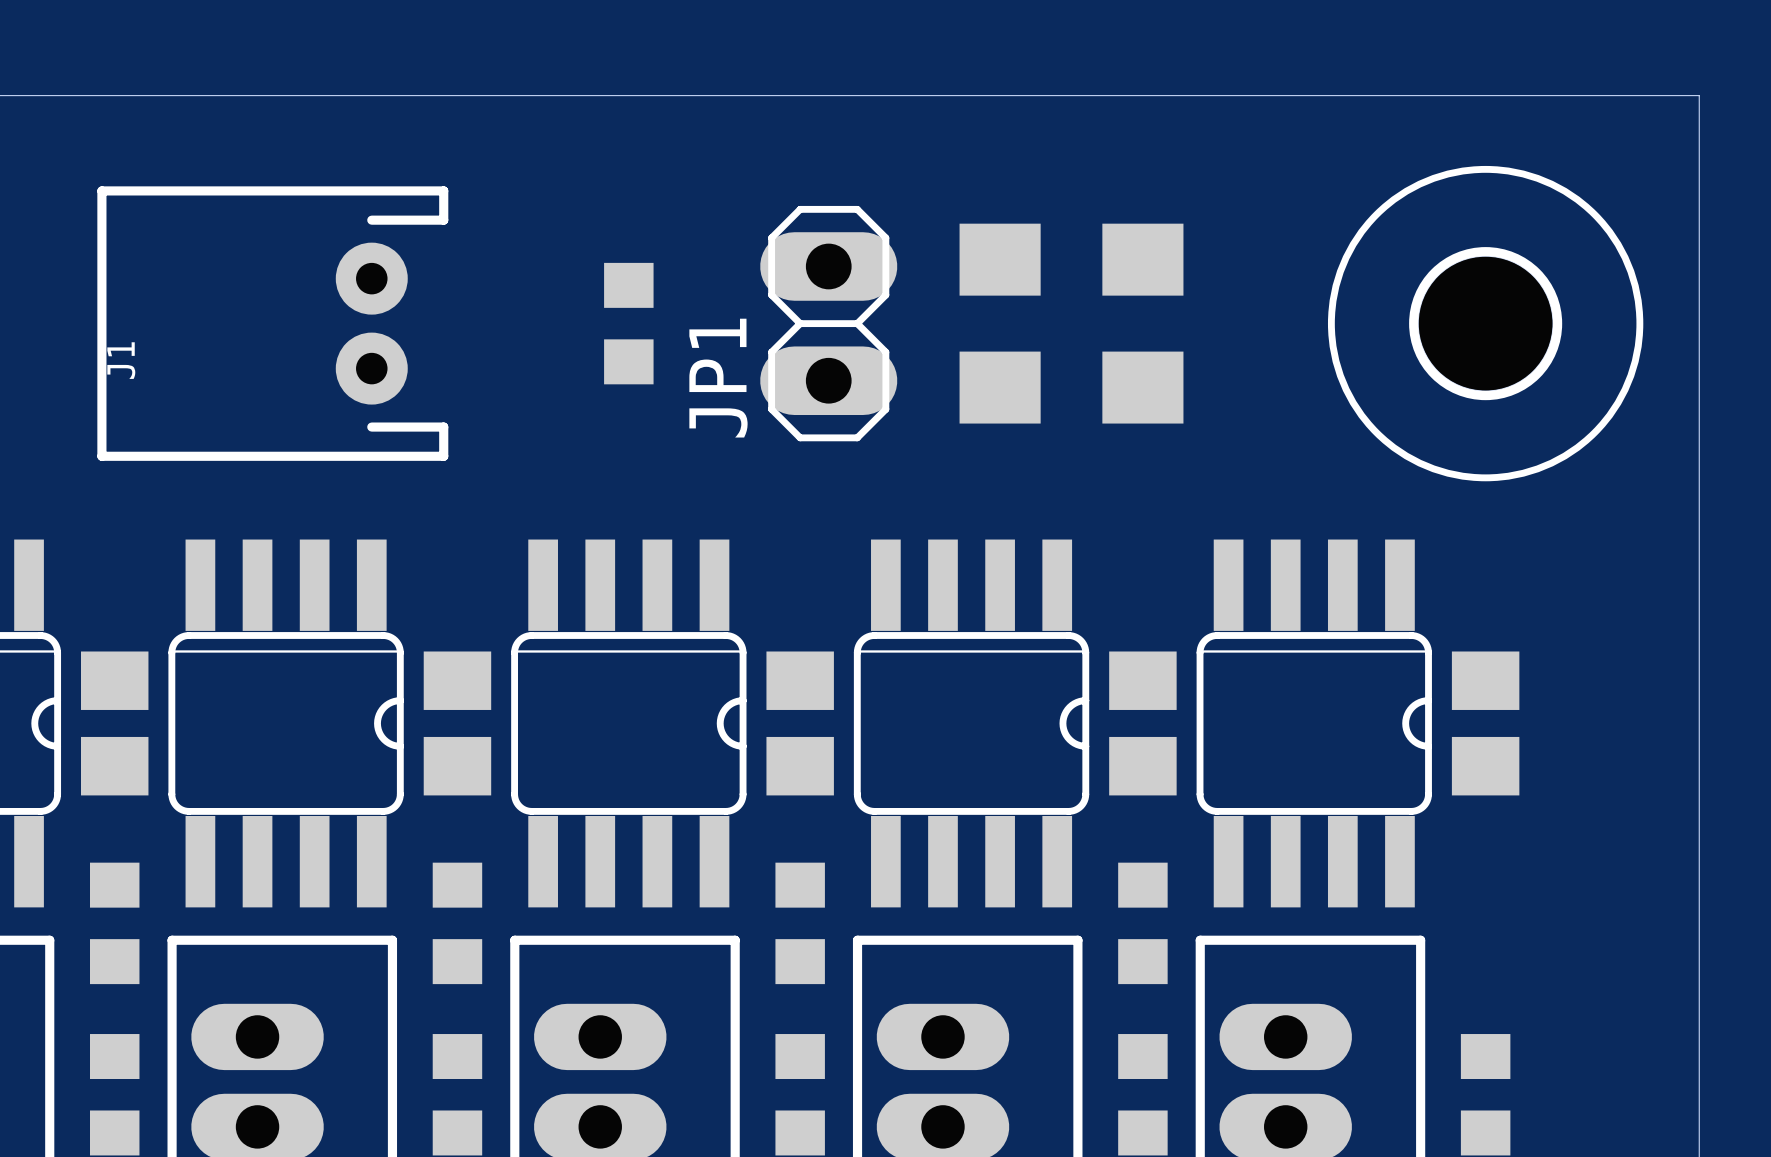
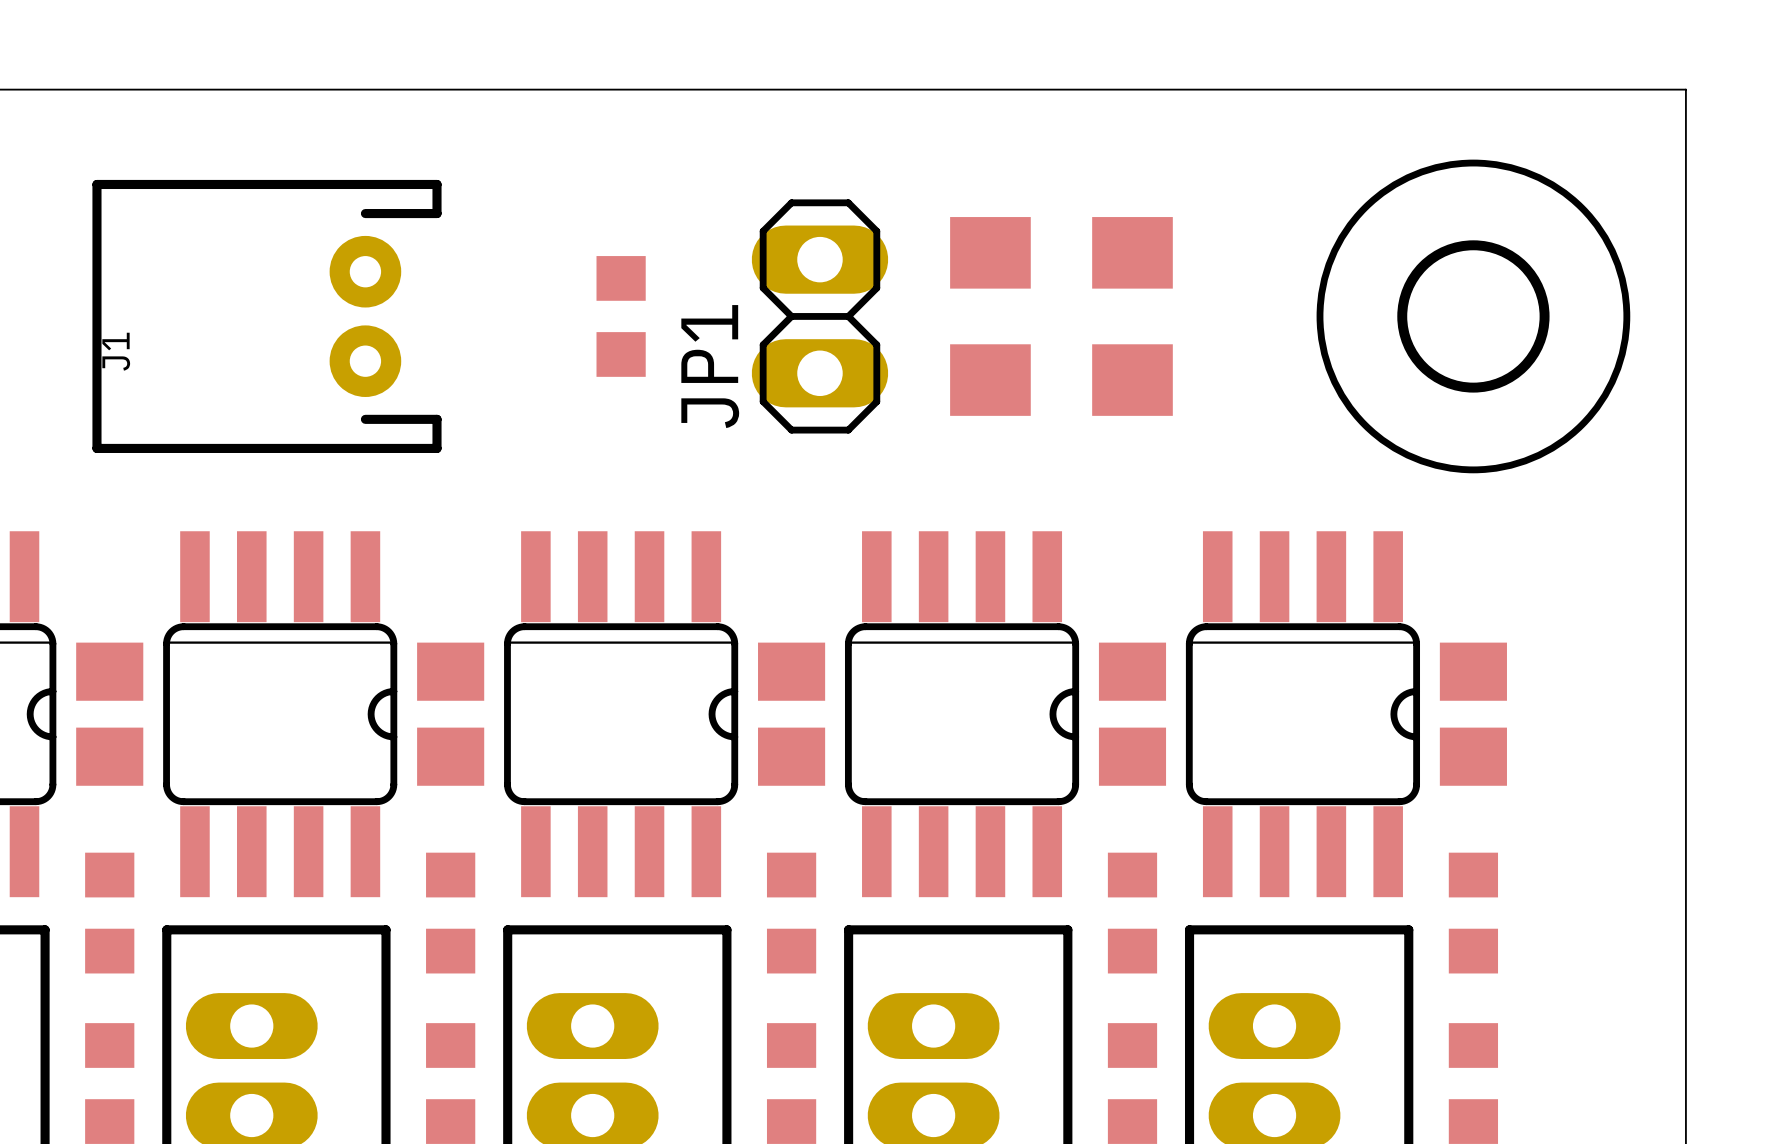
part: none -> (1473, 913)

